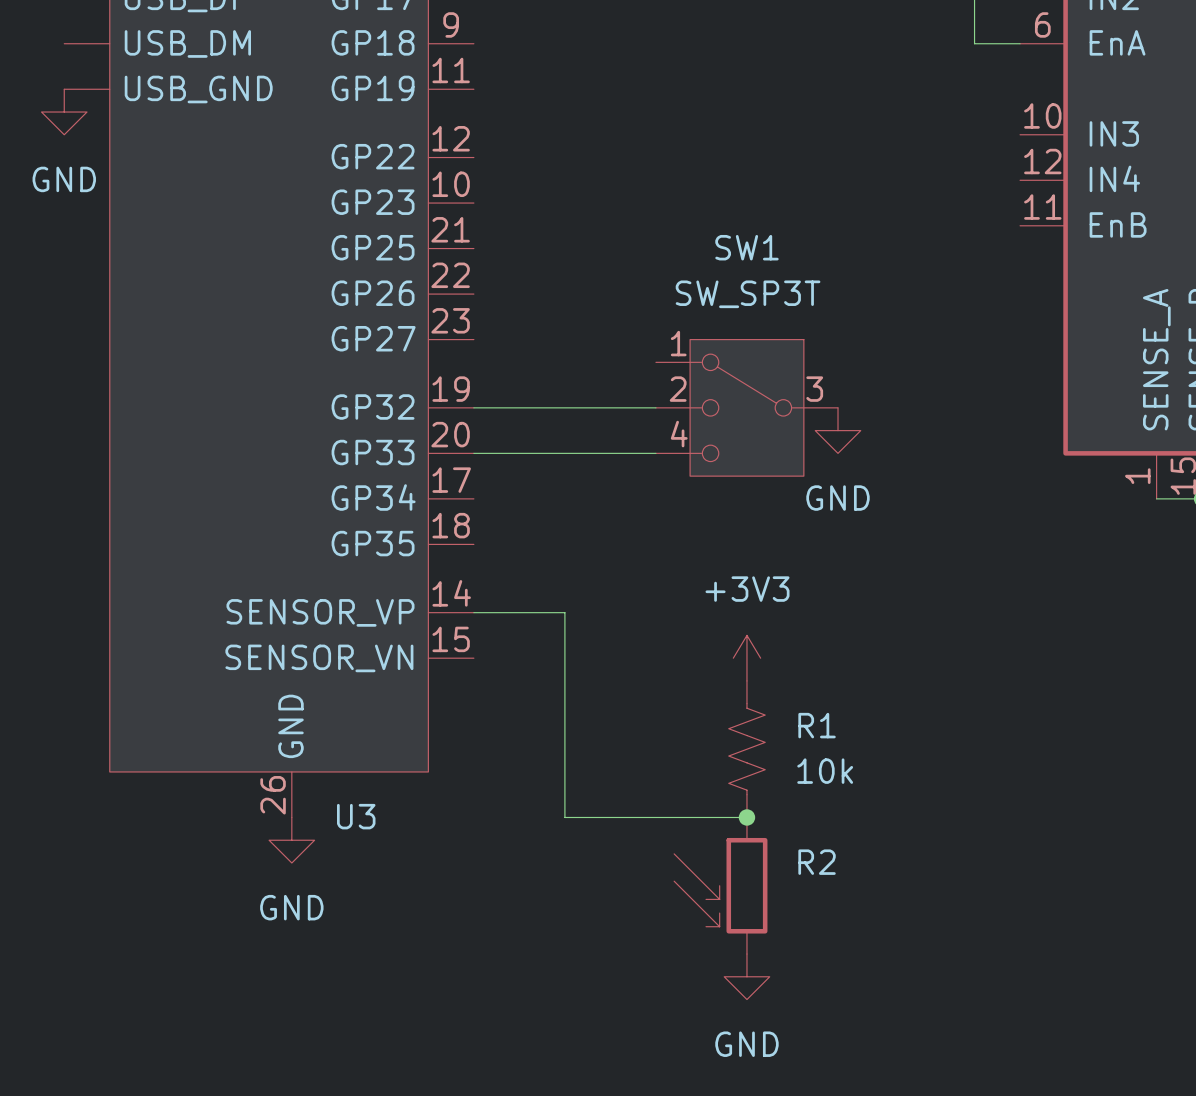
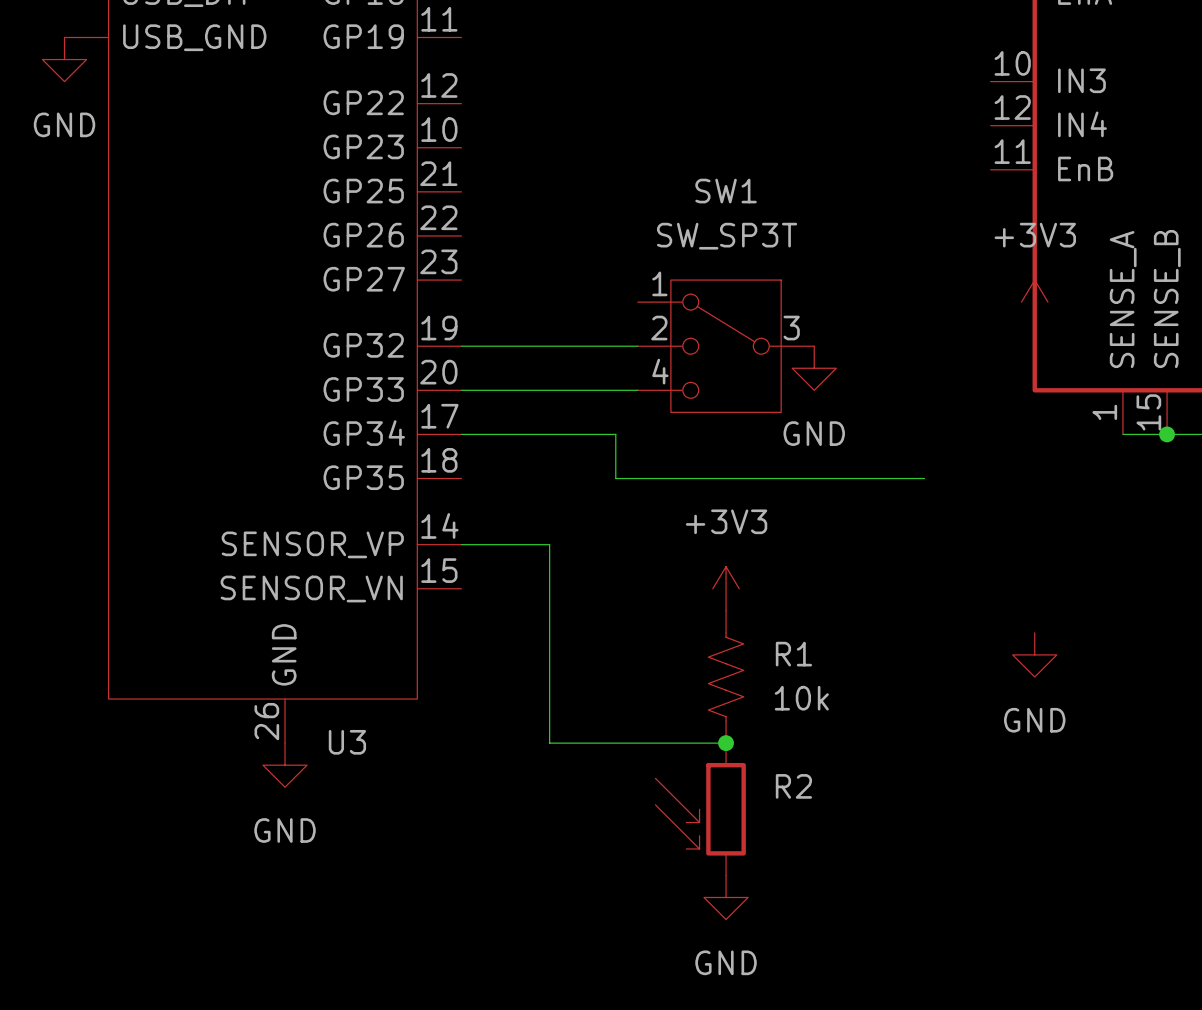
power symbol: none -> +3V3 (1034, 302)
wire: none -> (461, 434) (615, 434) (615, 478) (924, 478)
power symbol: none -> GND (1034, 654)

